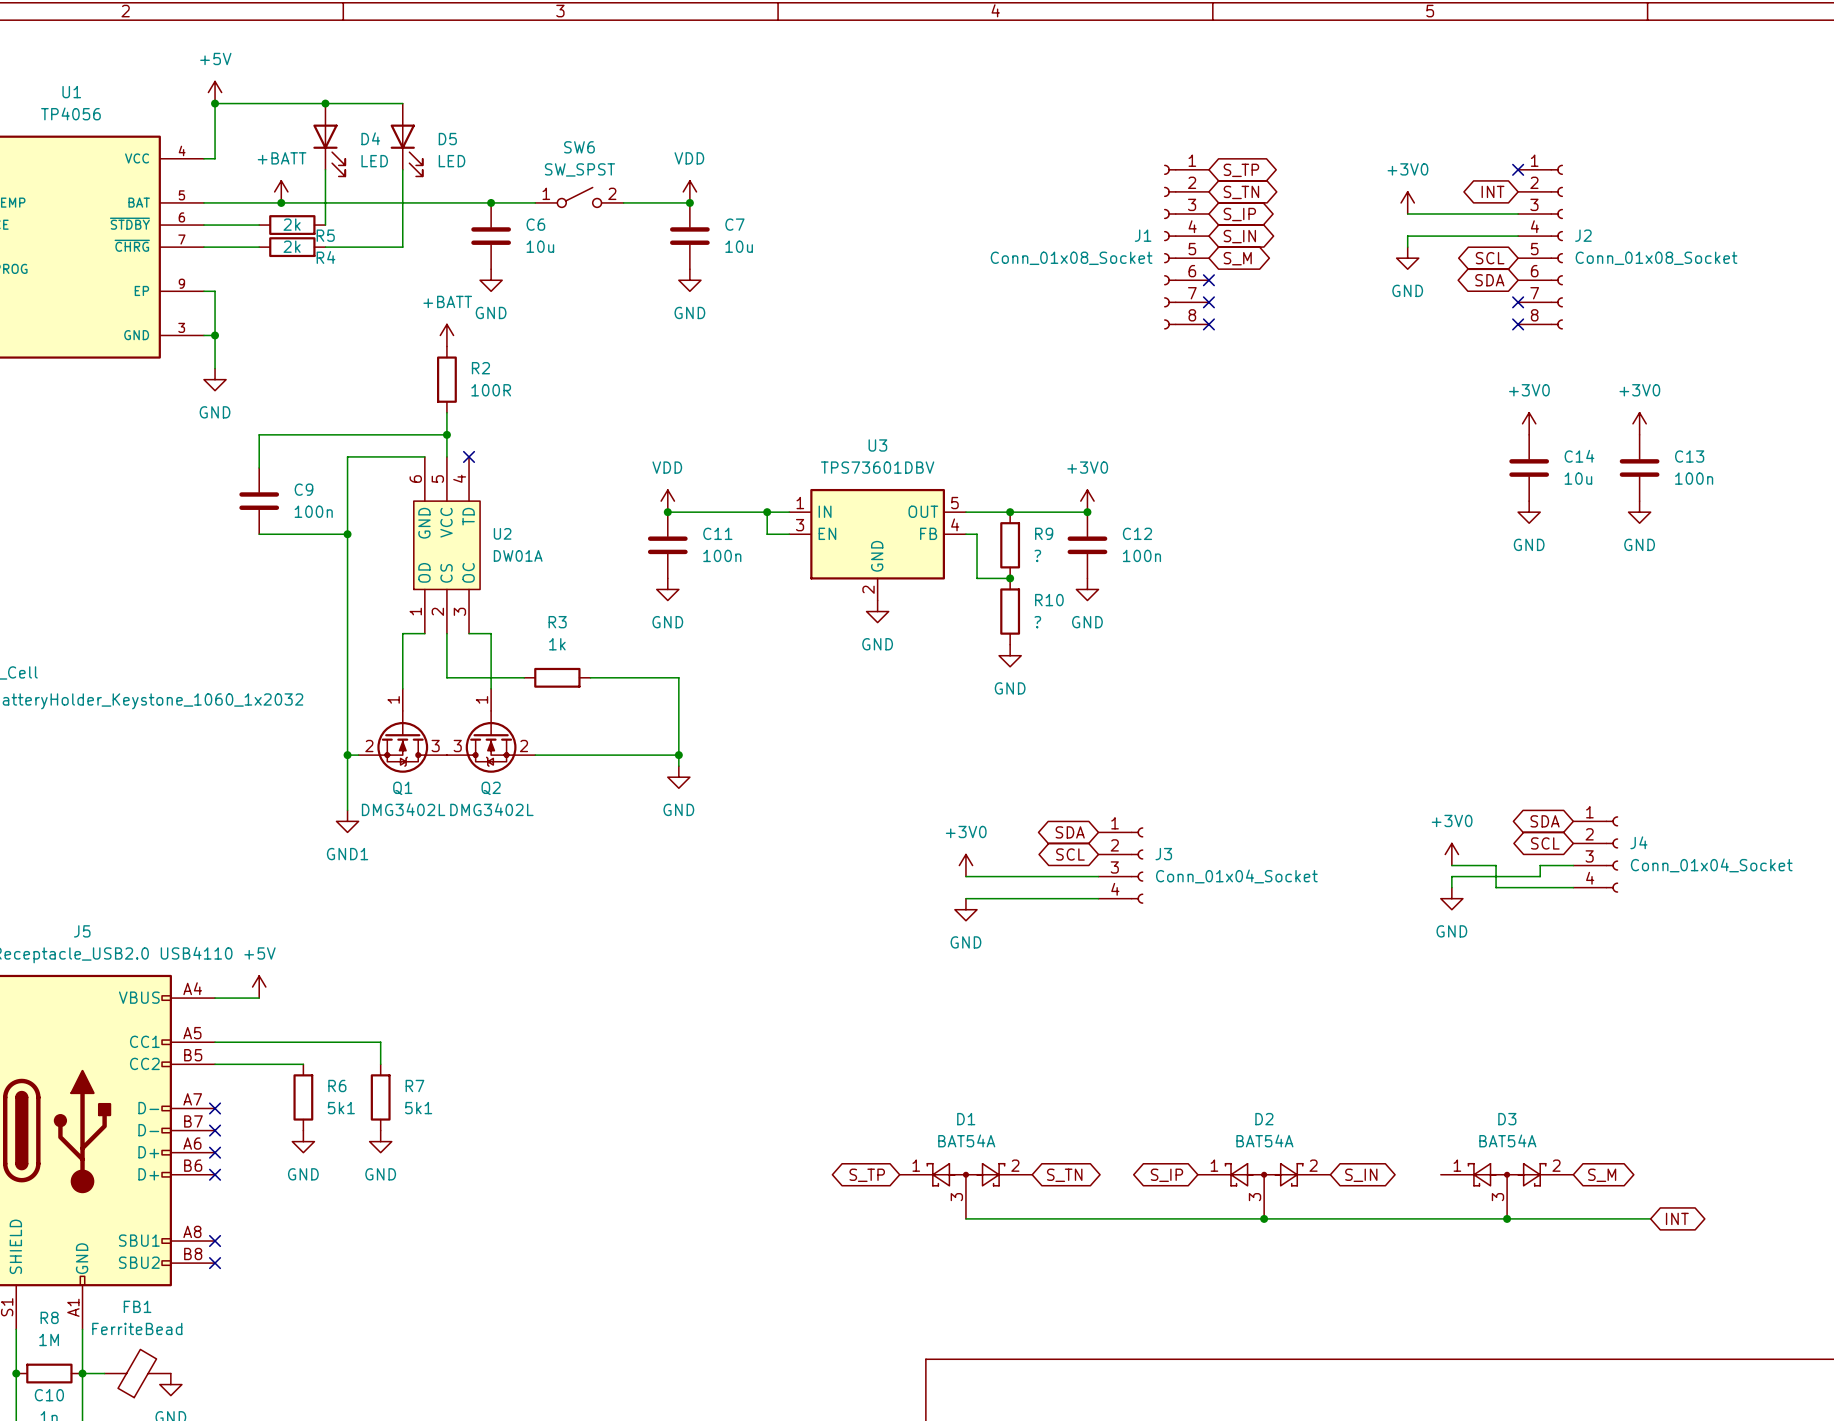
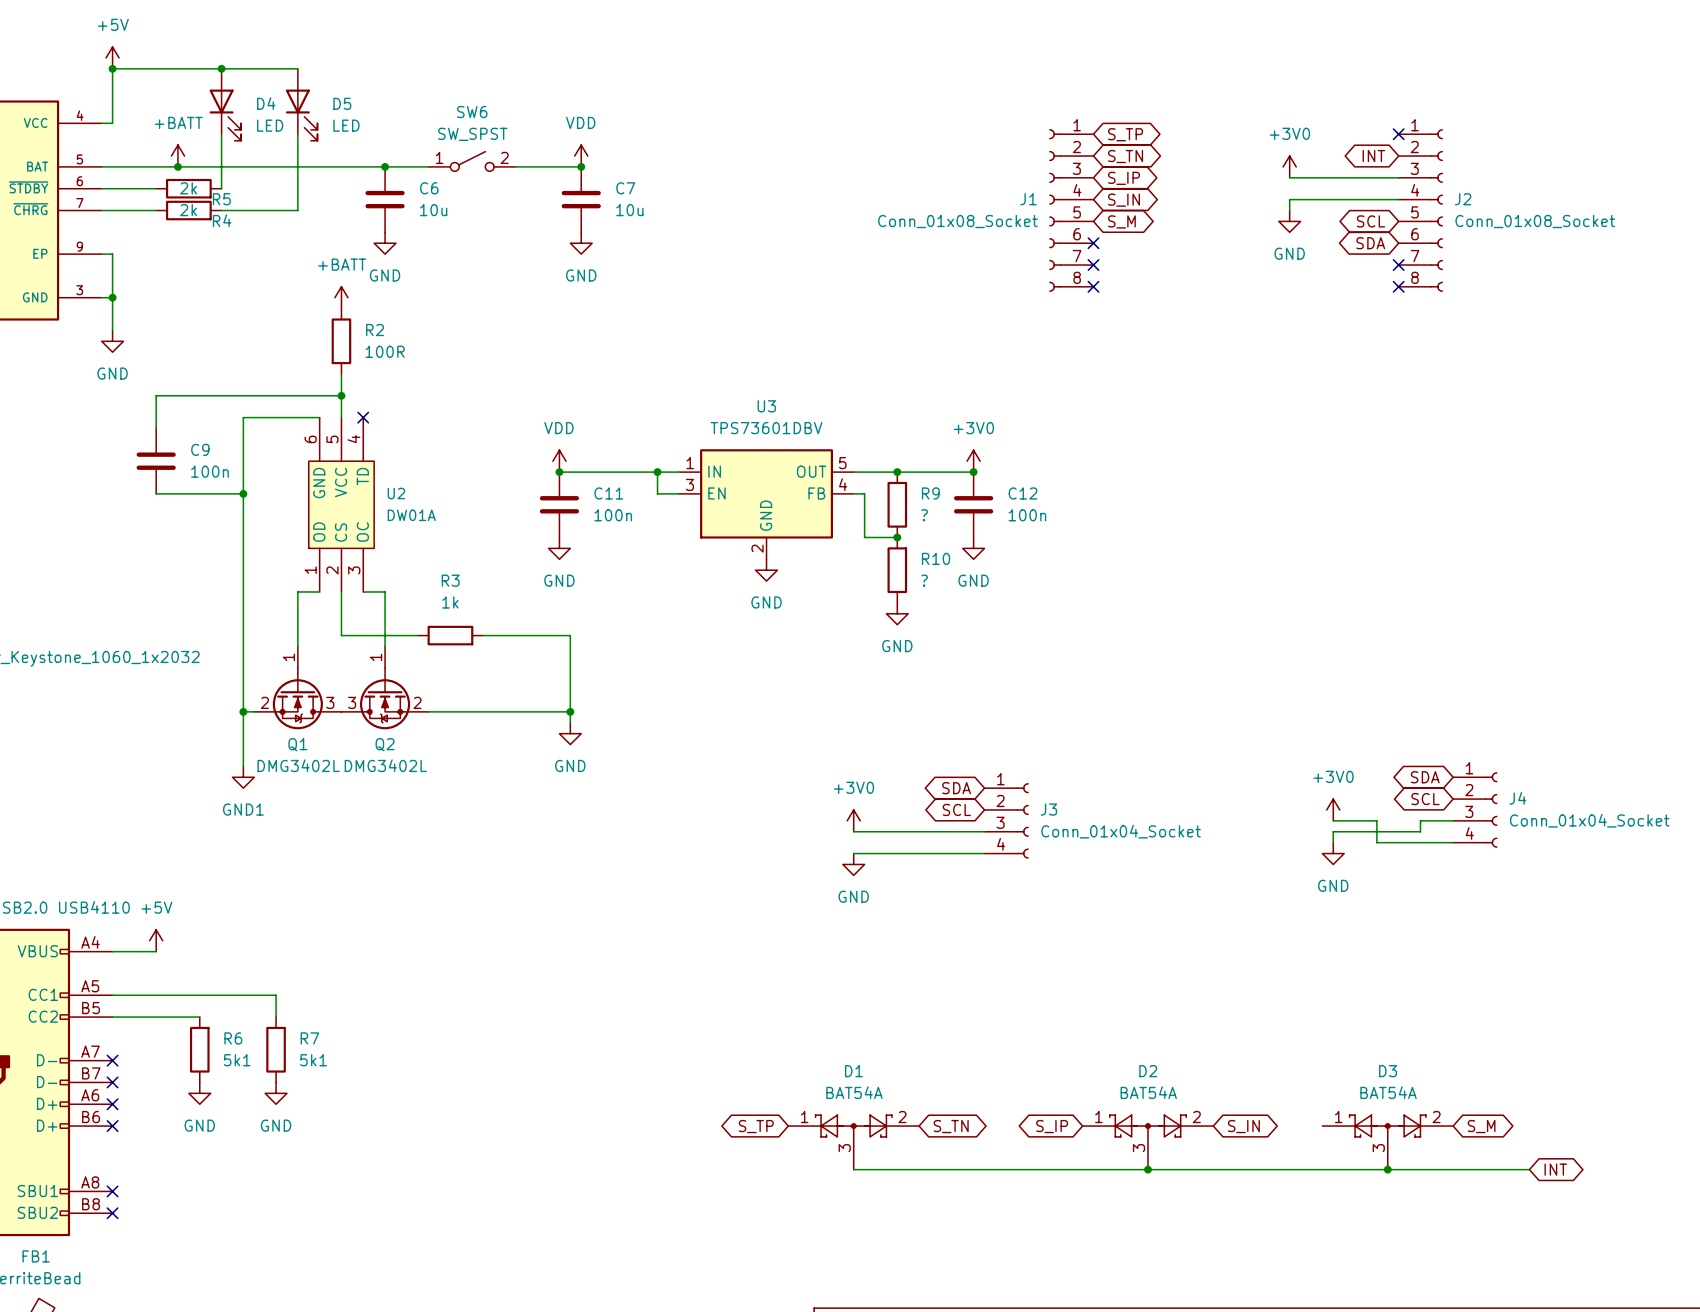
power symbol: +3V0 (1529, 423) -> none
power symbol: +3V0 (1639, 423) -> none
C14: 10u (1529, 467) -> none
C13: 100n (1639, 467) -> none
power symbol: GND (1529, 512) -> none
power symbol: GND (1639, 512) -> none

